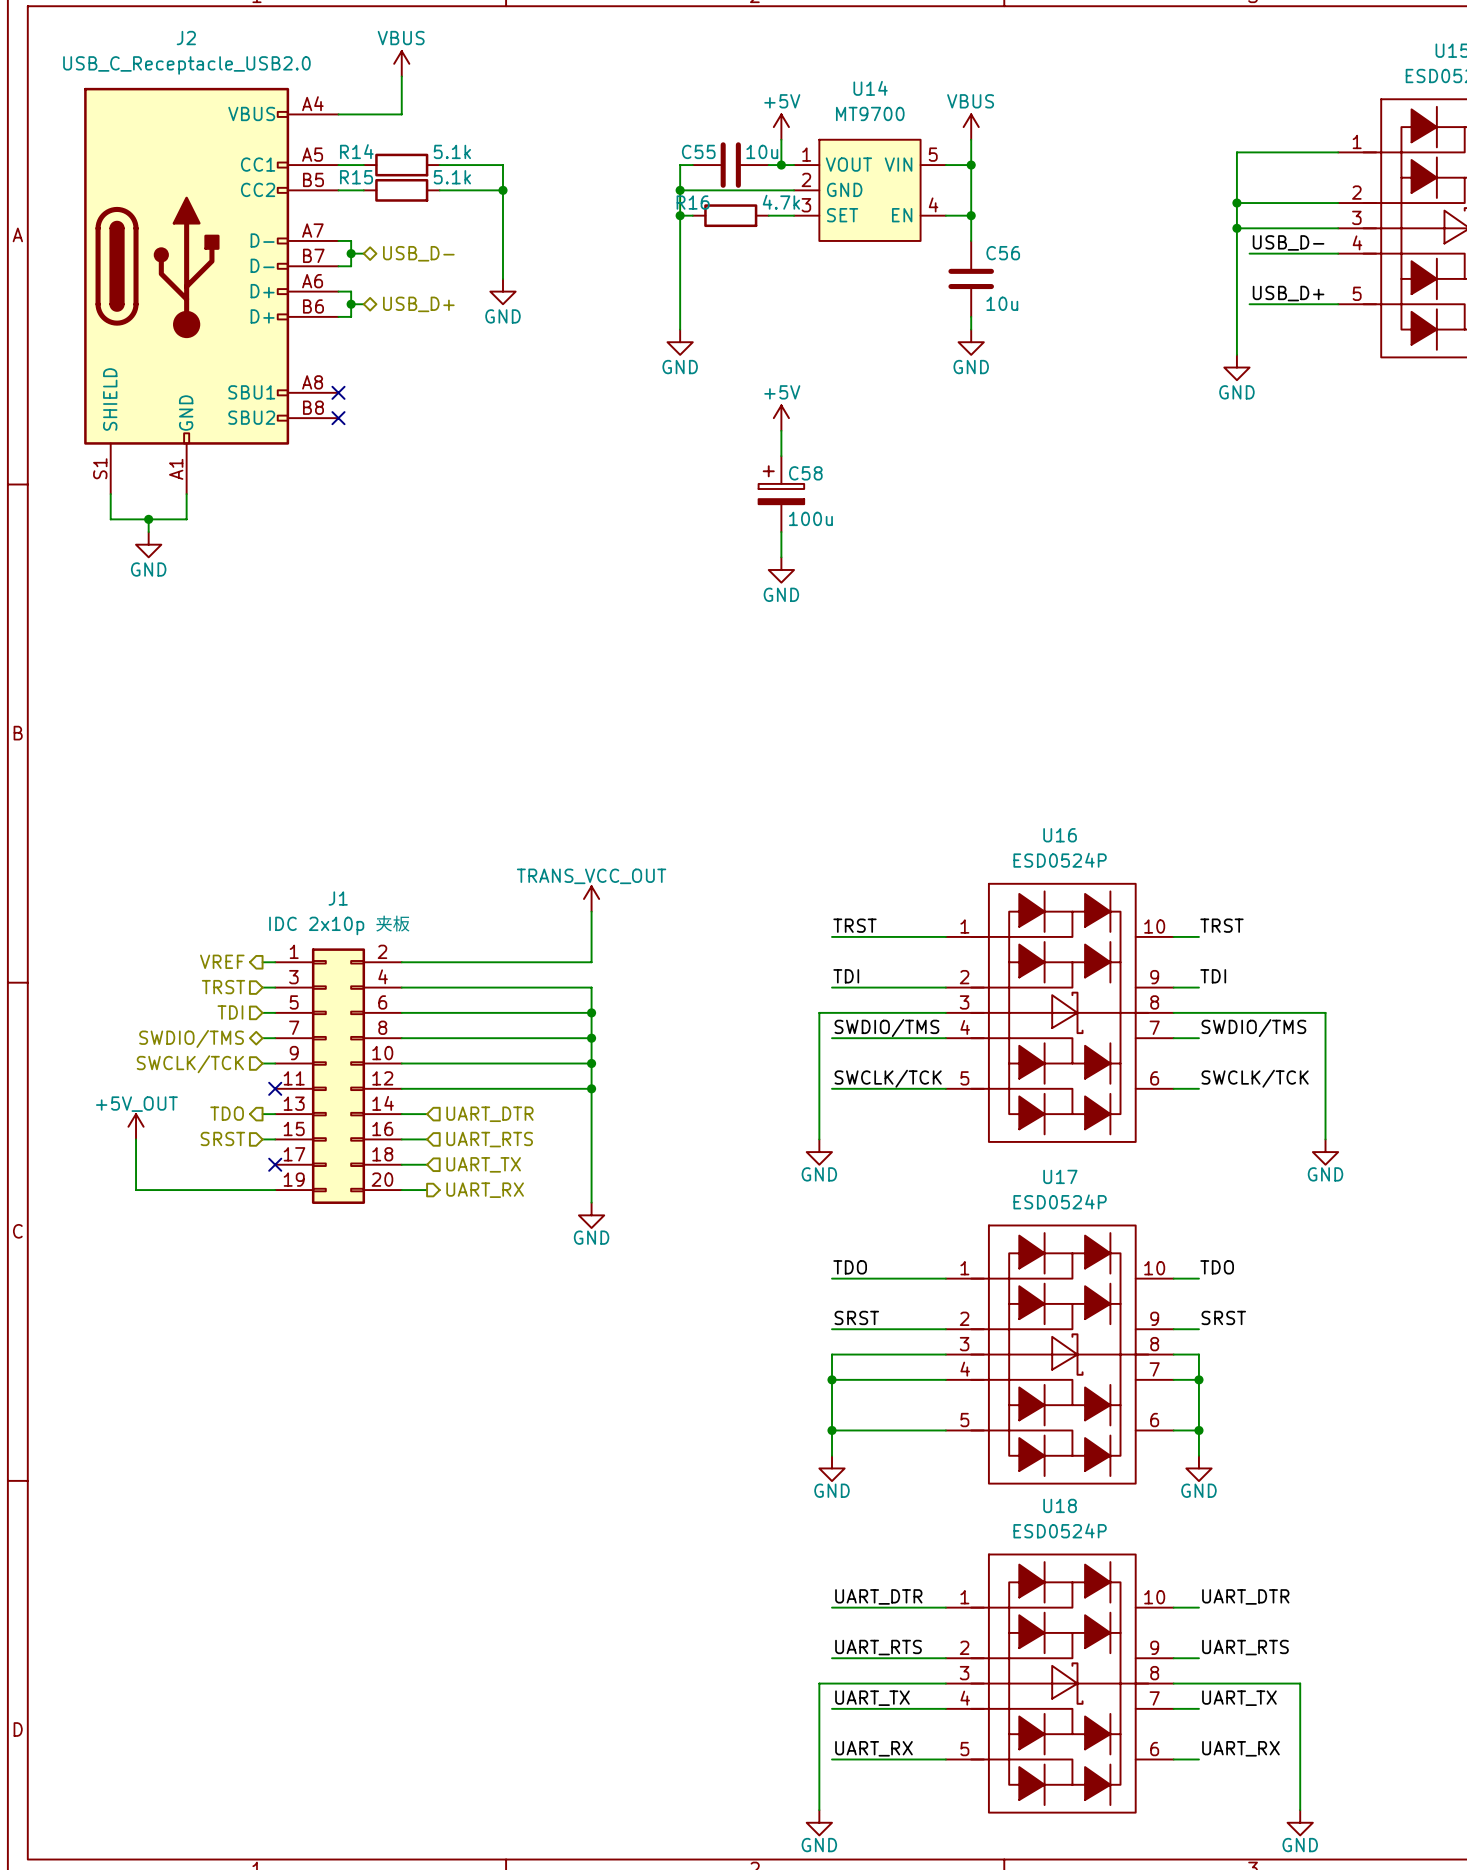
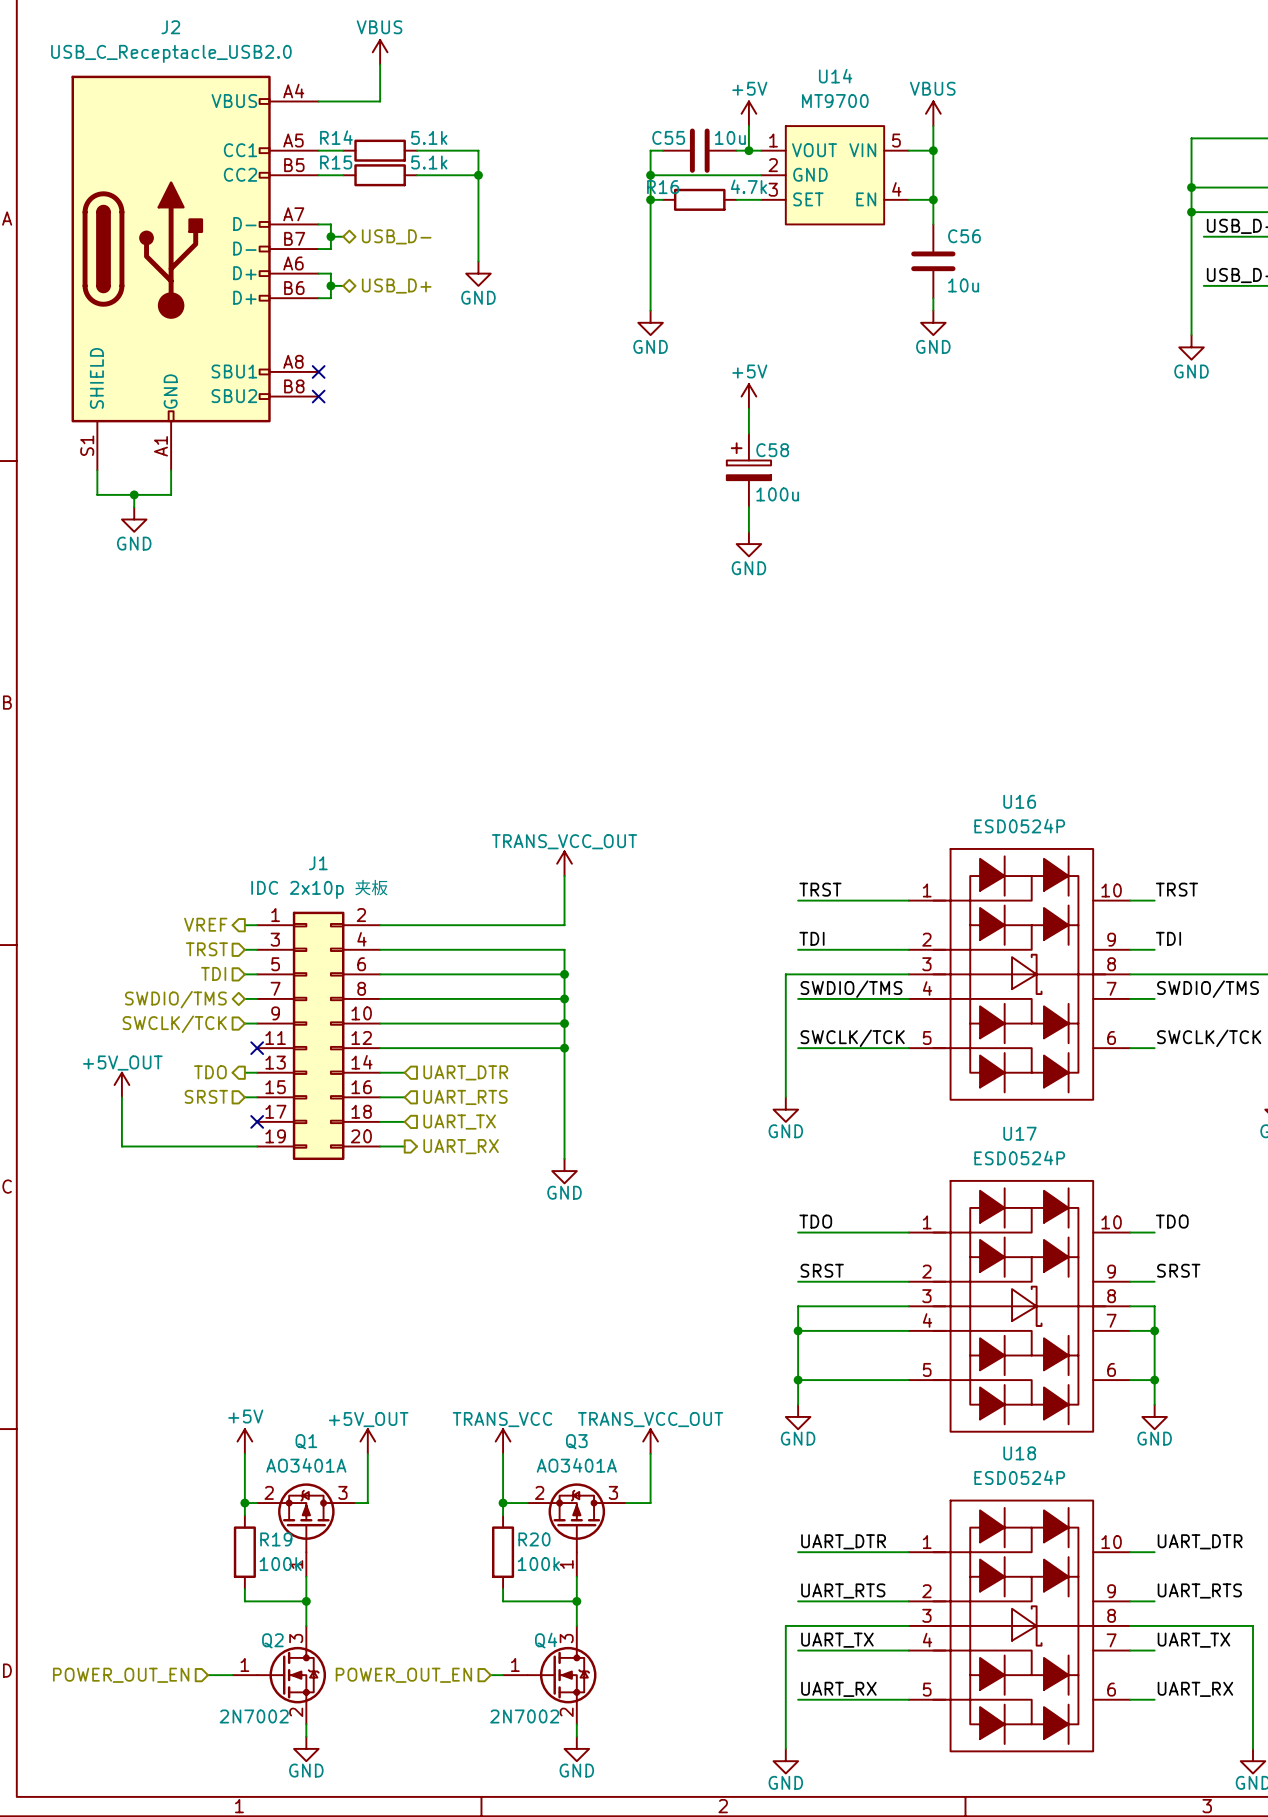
power symbol: none -> +5V (244, 1441)
power symbol: none -> +5V_OUT (367, 1441)
power symbol: none -> TRANS_VCC (503, 1441)
power symbol: none -> TRANS_VCC_OUT (650, 1441)
wire: none -> (244, 1453) (244, 1515)
wire: none -> (367, 1453) (367, 1503) (355, 1503)
wire: none -> (503, 1453) (503, 1515)
wire: none -> (650, 1453) (650, 1503) (625, 1503)
wire: none -> (244, 1503) (257, 1503)
junction: none -> (244, 1503)
wire: none -> (503, 1503) (527, 1503)
junction: none -> (503, 1503)
Q1: none -> AO3401A (306, 1530)
Q3: none -> AO3401A (576, 1530)
R19: none -> 100k (244, 1552)
R20: none -> 100k (503, 1552)
wire: none -> (306, 1576) (306, 1625)
wire: none -> (576, 1576) (576, 1625)
wire: none -> (244, 1589) (244, 1601) (306, 1601)
wire: none -> (503, 1589) (503, 1601) (576, 1601)
junction: none -> (306, 1601)
junction: none -> (576, 1601)
hierarchical label: none -> POWER_OUT_EN (121, 1675)
wire: none -> (207, 1675) (232, 1675)
Q2: none -> 2N7002 (279, 1675)
hierarchical label: none -> POWER_OUT_EN (403, 1675)
wire: none -> (490, 1675) (503, 1675)
Q4: none -> 2N7002 (549, 1675)
wire: none -> (306, 1724) (306, 1736)
wire: none -> (576, 1724) (576, 1736)
power symbol: none -> GND (306, 1748)
power symbol: none -> GND (576, 1748)

